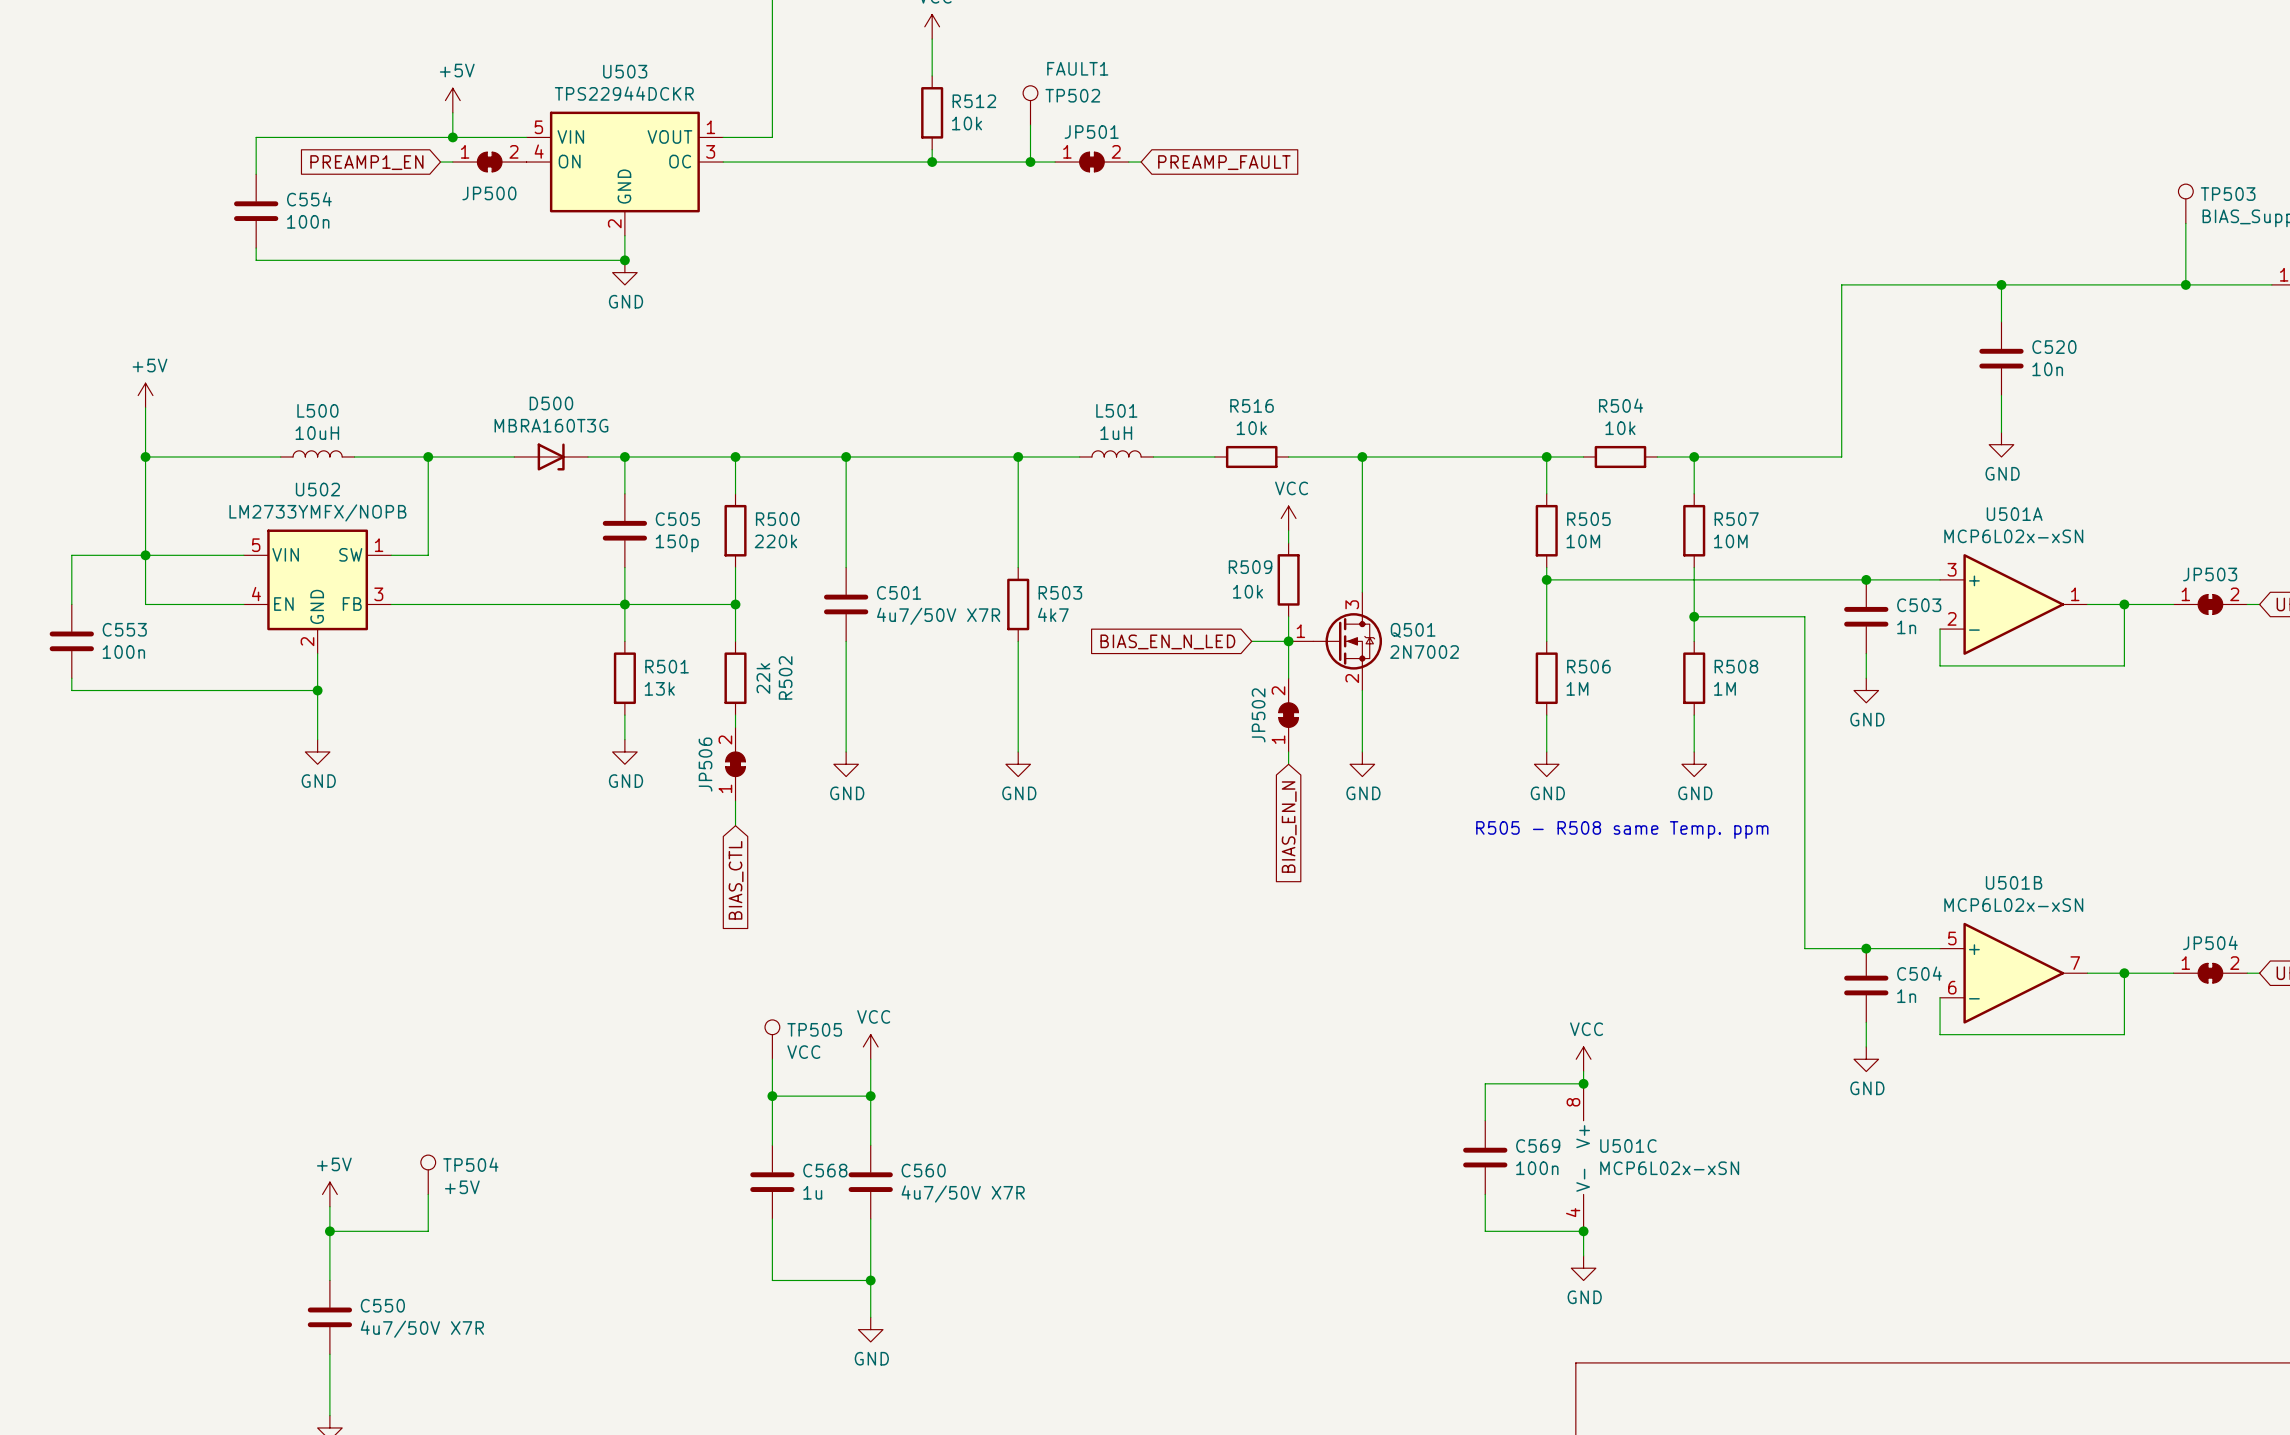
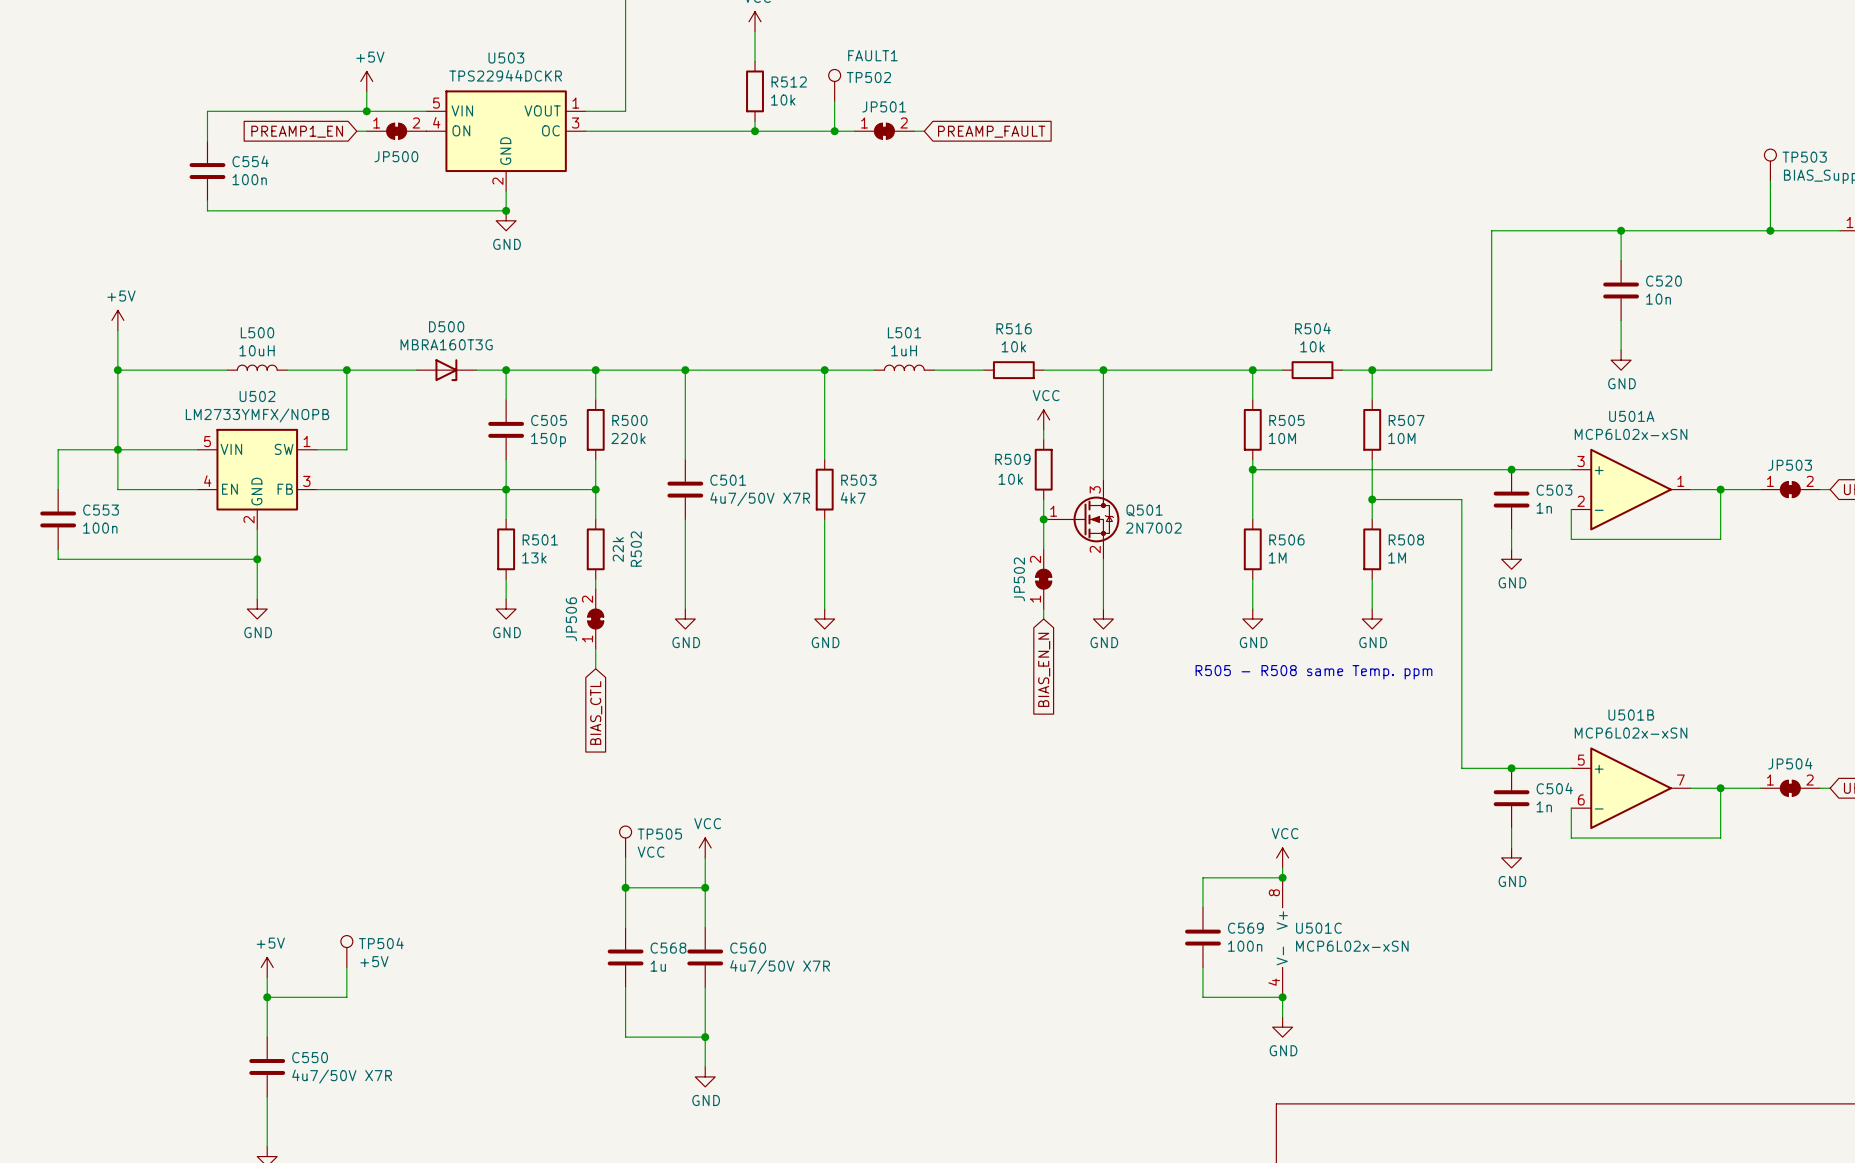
global label: BIAS_EN_N_LED (1167, 641) -> none
wire: (1251, 641) (1288, 641) -> none

